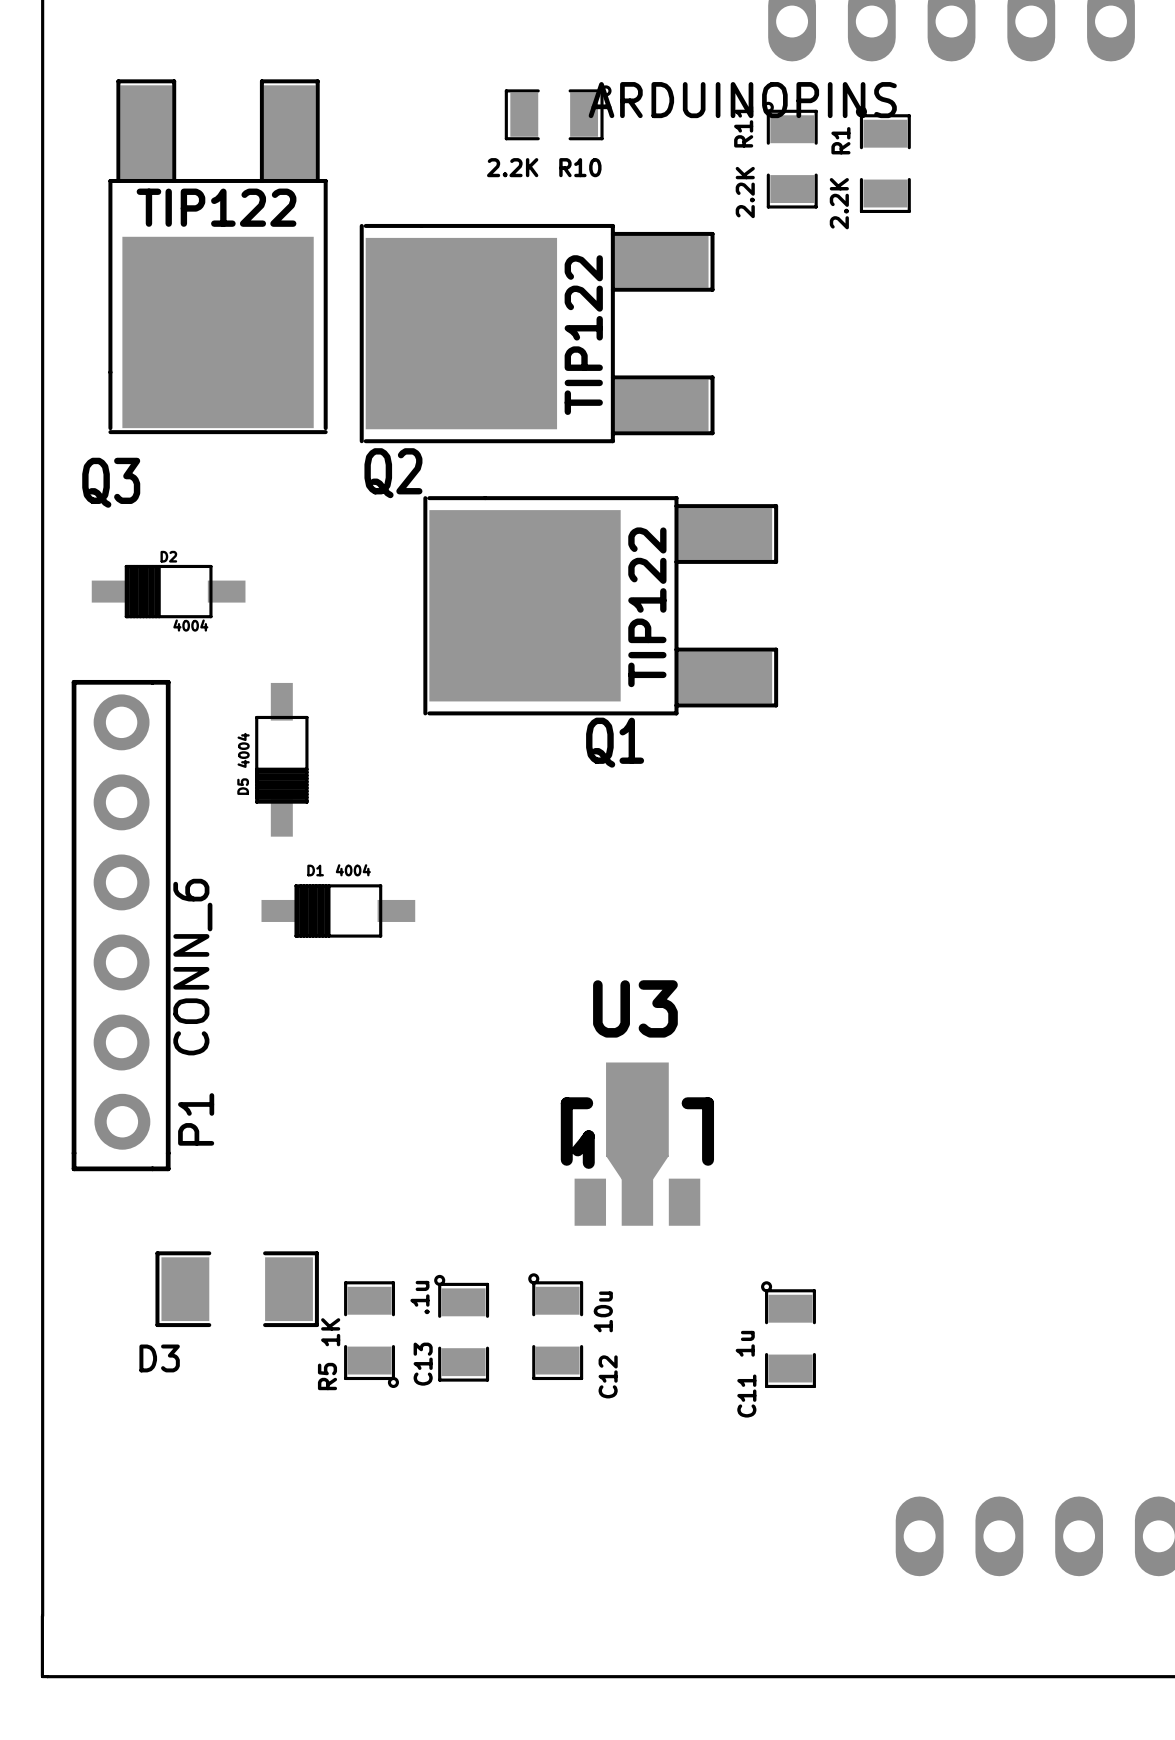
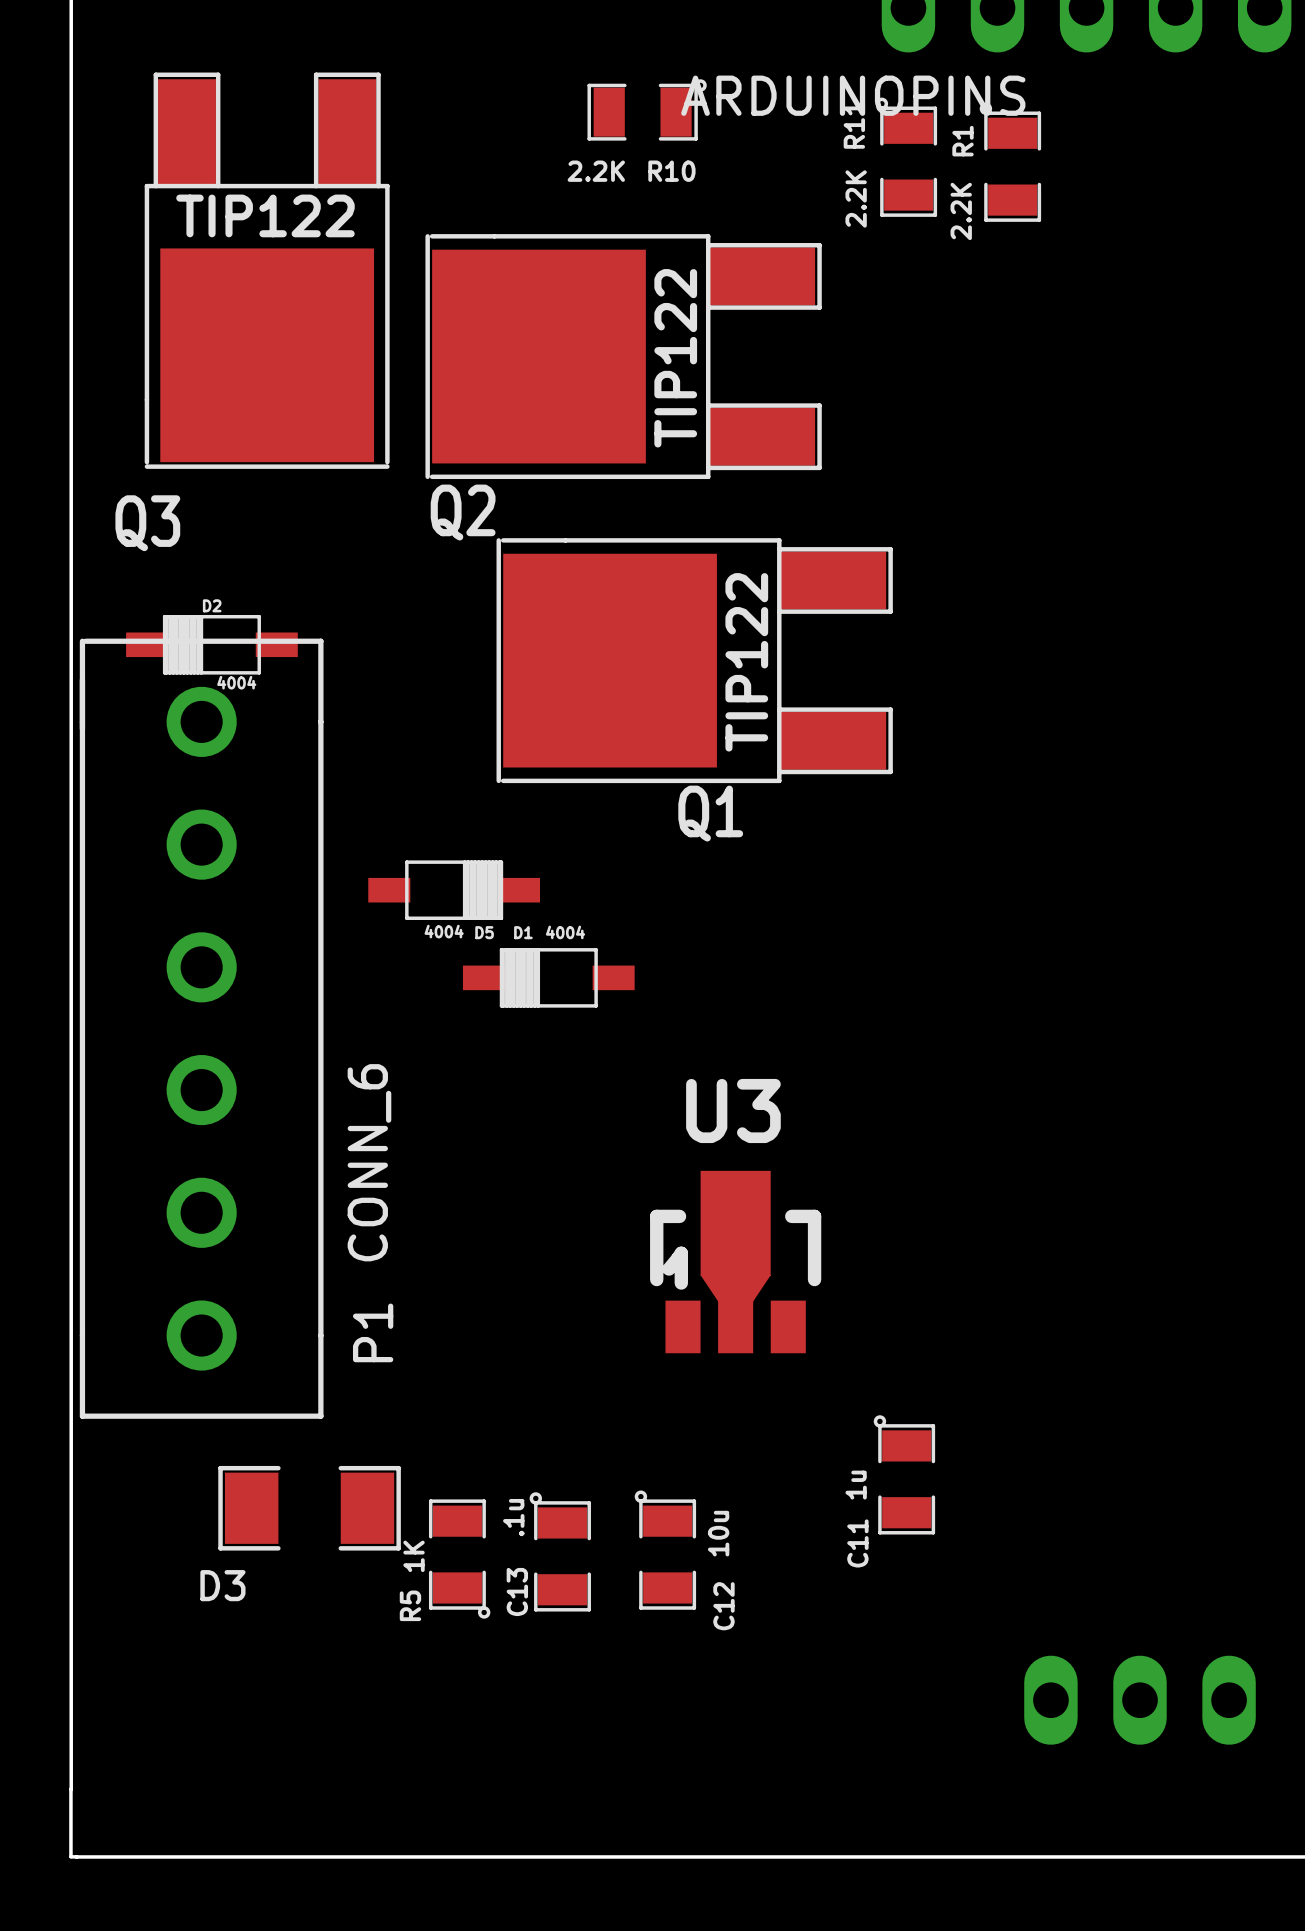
P1 footprint: [71, 679, 171, 1172] -> [79, 638, 324, 1419]
D5 rotation: 0° (281, 759) -> 90° counterclockwise (454, 890)
D5 position: (281, 759) -> (454, 890)
D1 position: (338, 910) -> (548, 977)
P1 value position: CONN_6 (192, 967) -> CONN_6 (369, 1162)
P1 name position: P1 (196, 1119) -> P1 (373, 1332)
D3 position: (237, 1289) -> (309, 1508)
C12 position: (555, 1326) -> (665, 1550)
C13 position: (461, 1328) -> (560, 1551)
R5 position: (371, 1334) -> (459, 1559)

